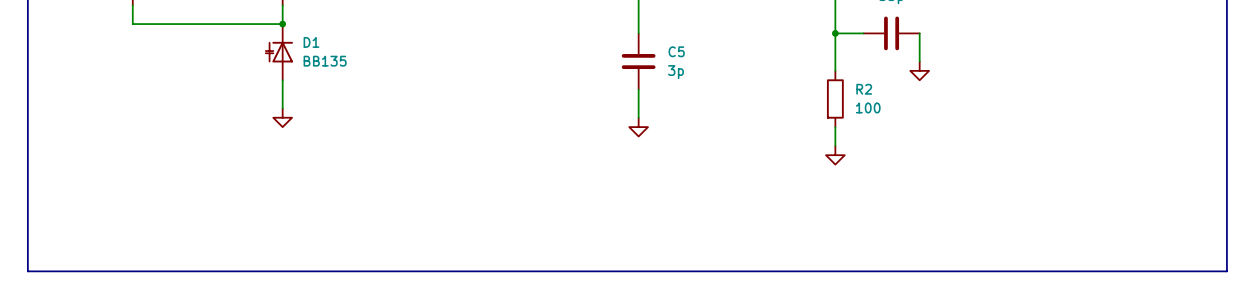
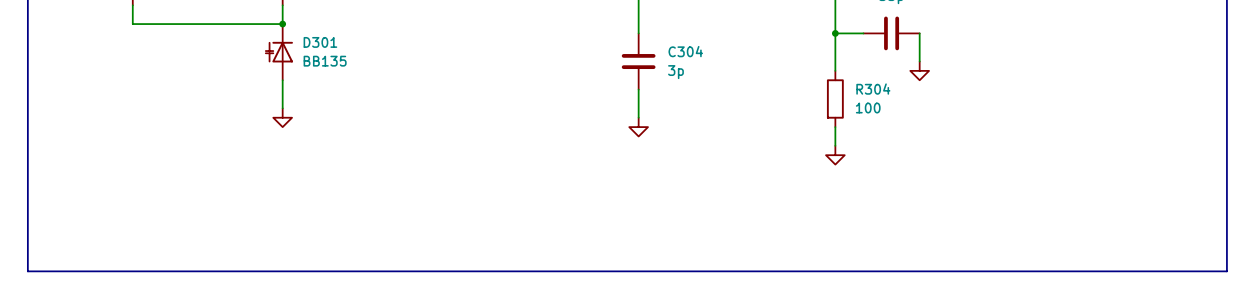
D1 name: D1 (311, 42) -> D301 (320, 42)
C5 name: C5 (676, 51) -> C304 (685, 51)
R2 name: R2 (864, 89) -> R304 (873, 89)

